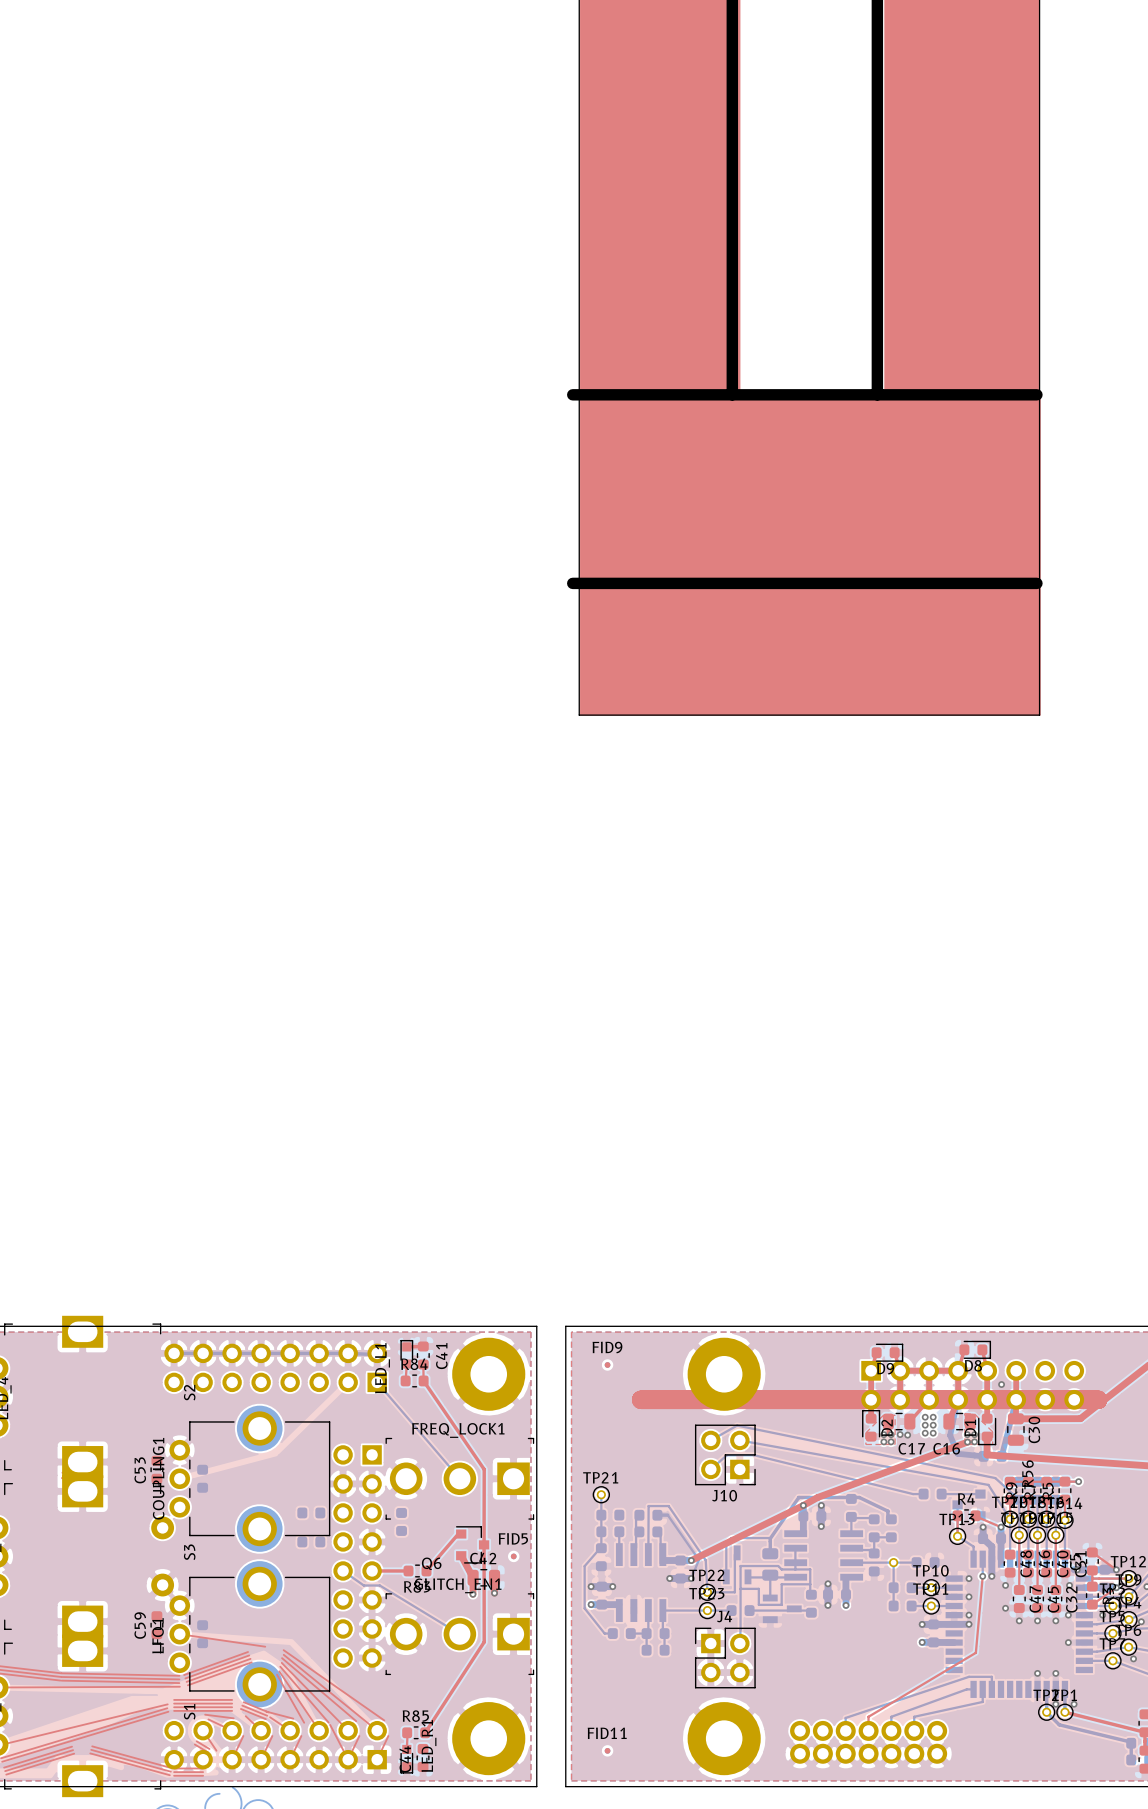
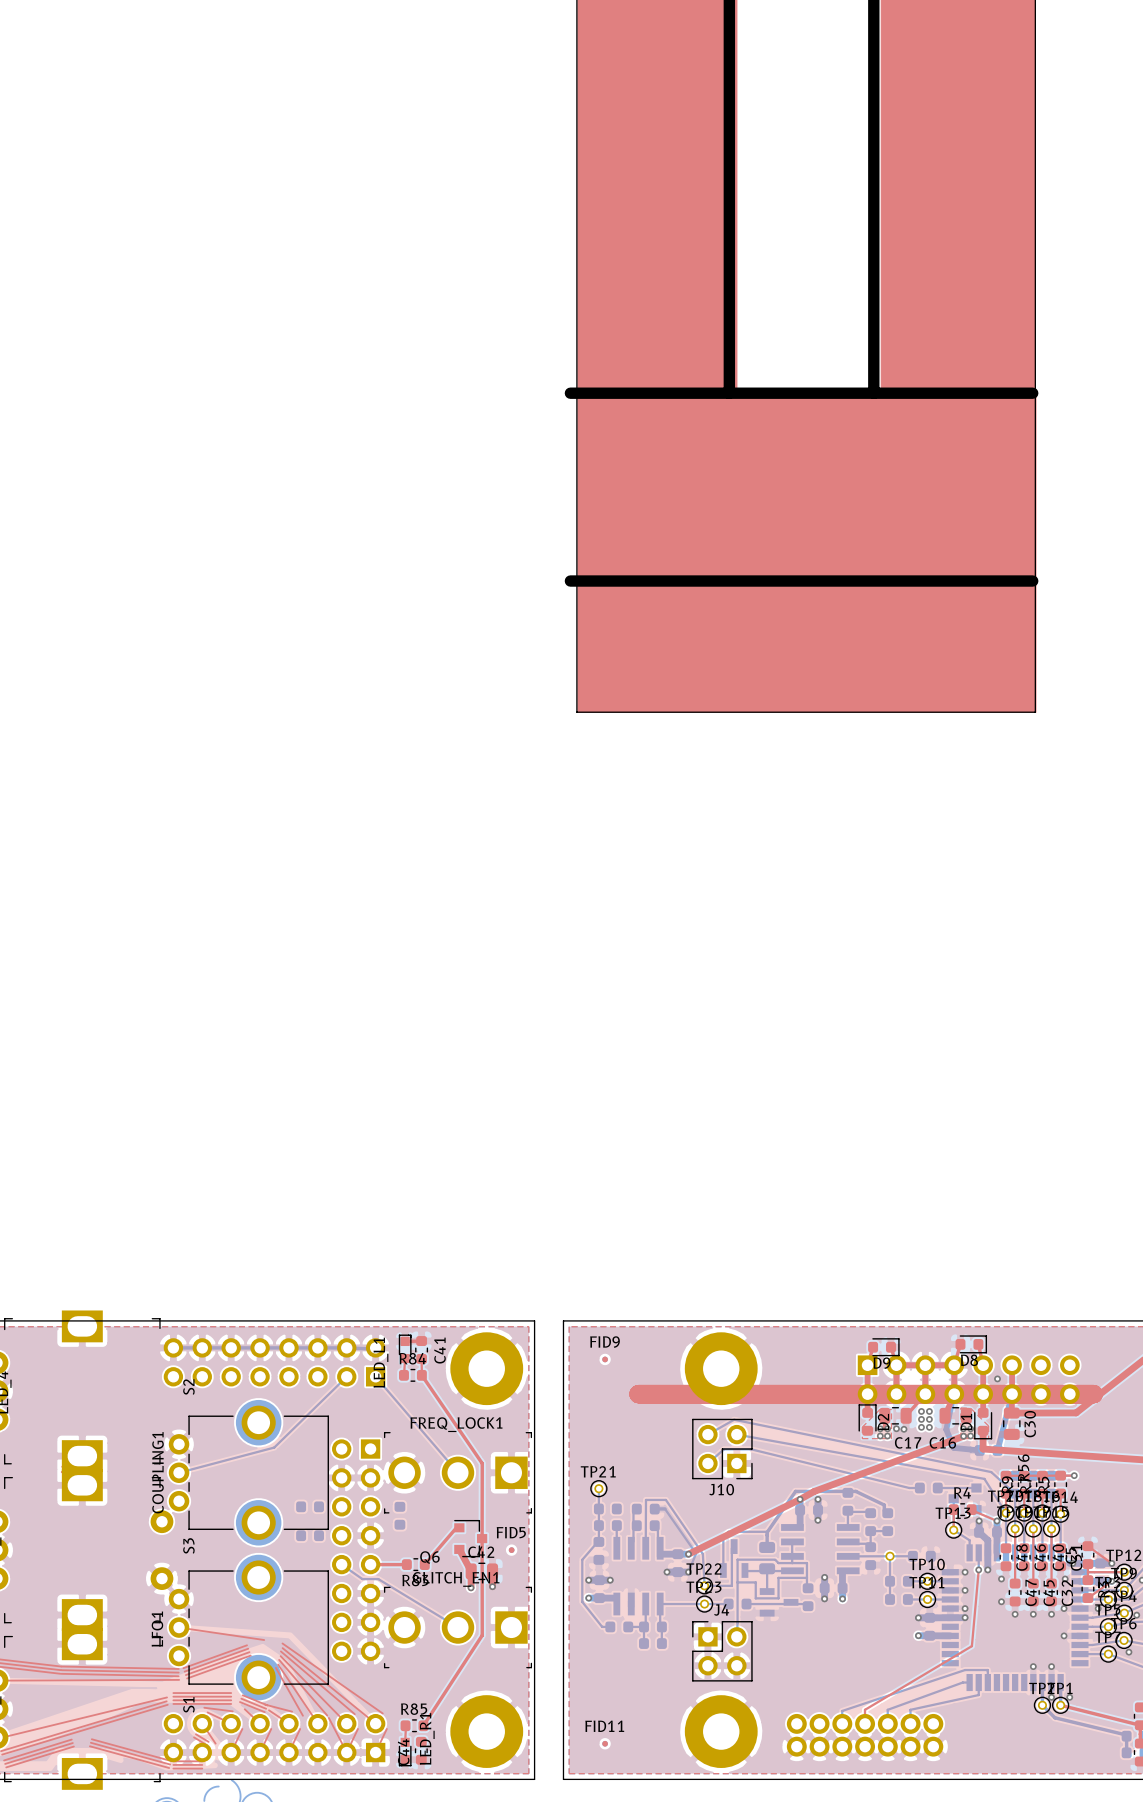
bottom track: none -> (346, 1376) (274, 1447) (179, 1472)
C53: (156, 1469) -> none
part: (202, 1478) -> none
C59: (156, 1625) -> none
part: (202, 1634) -> none

